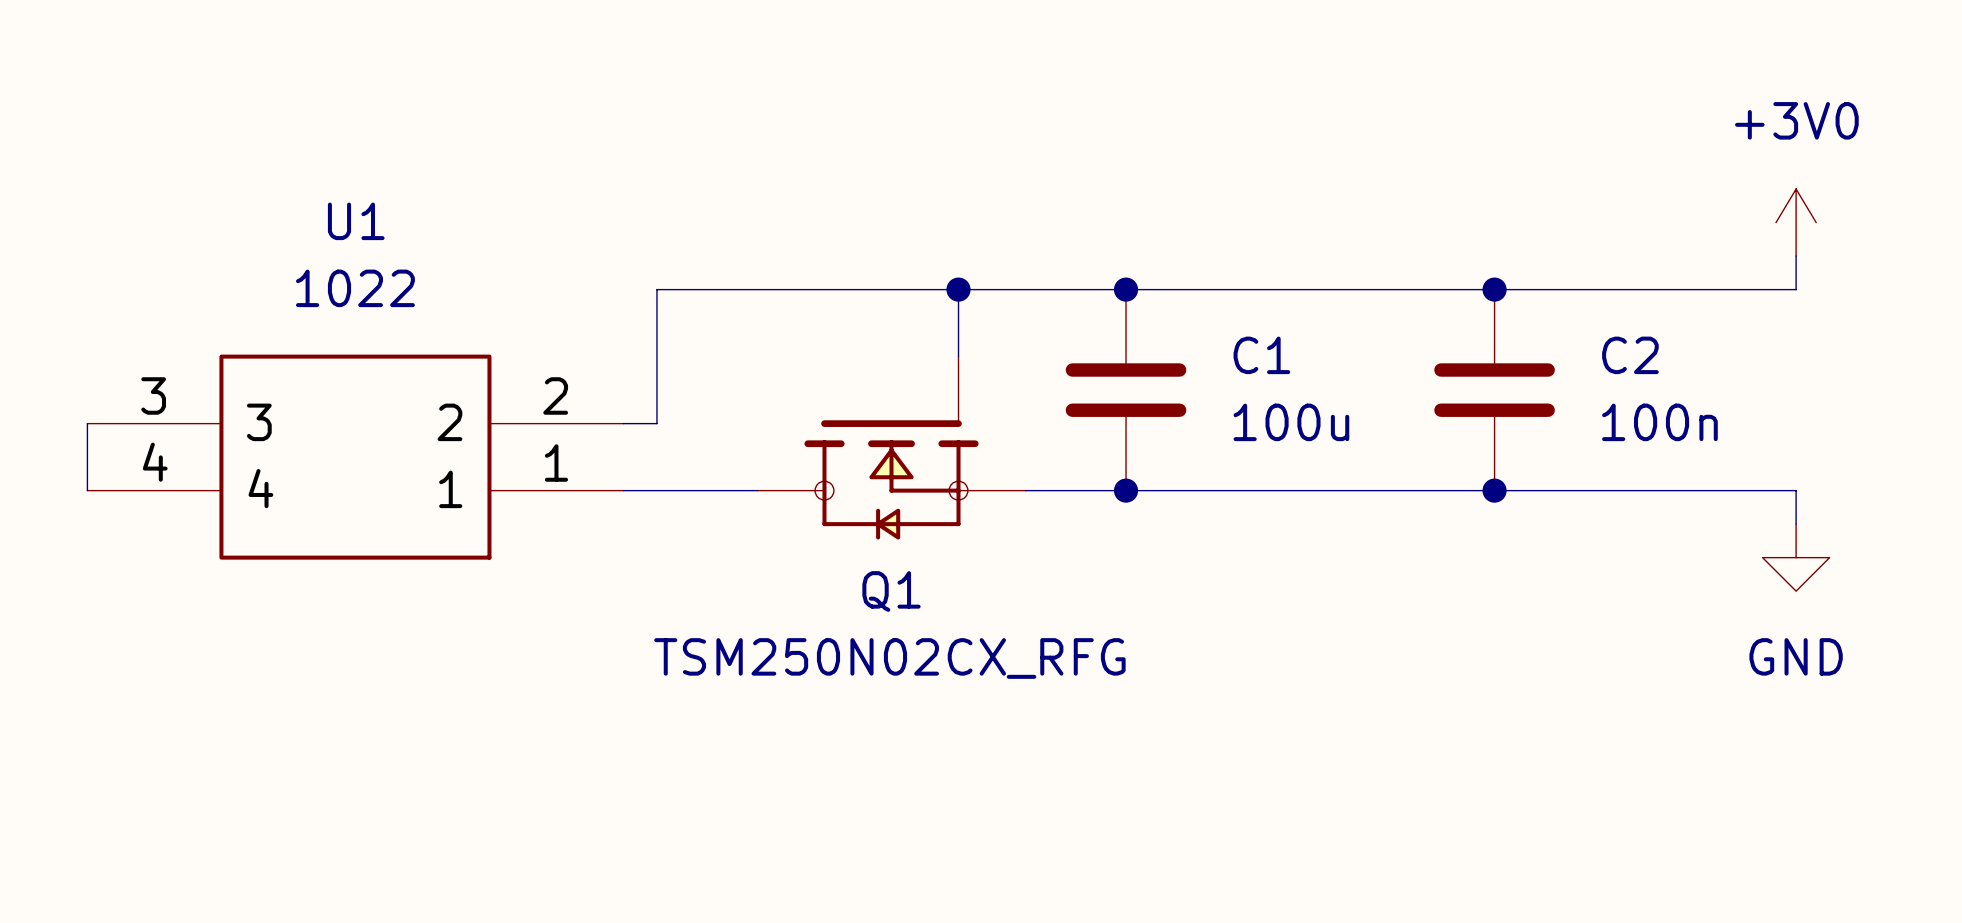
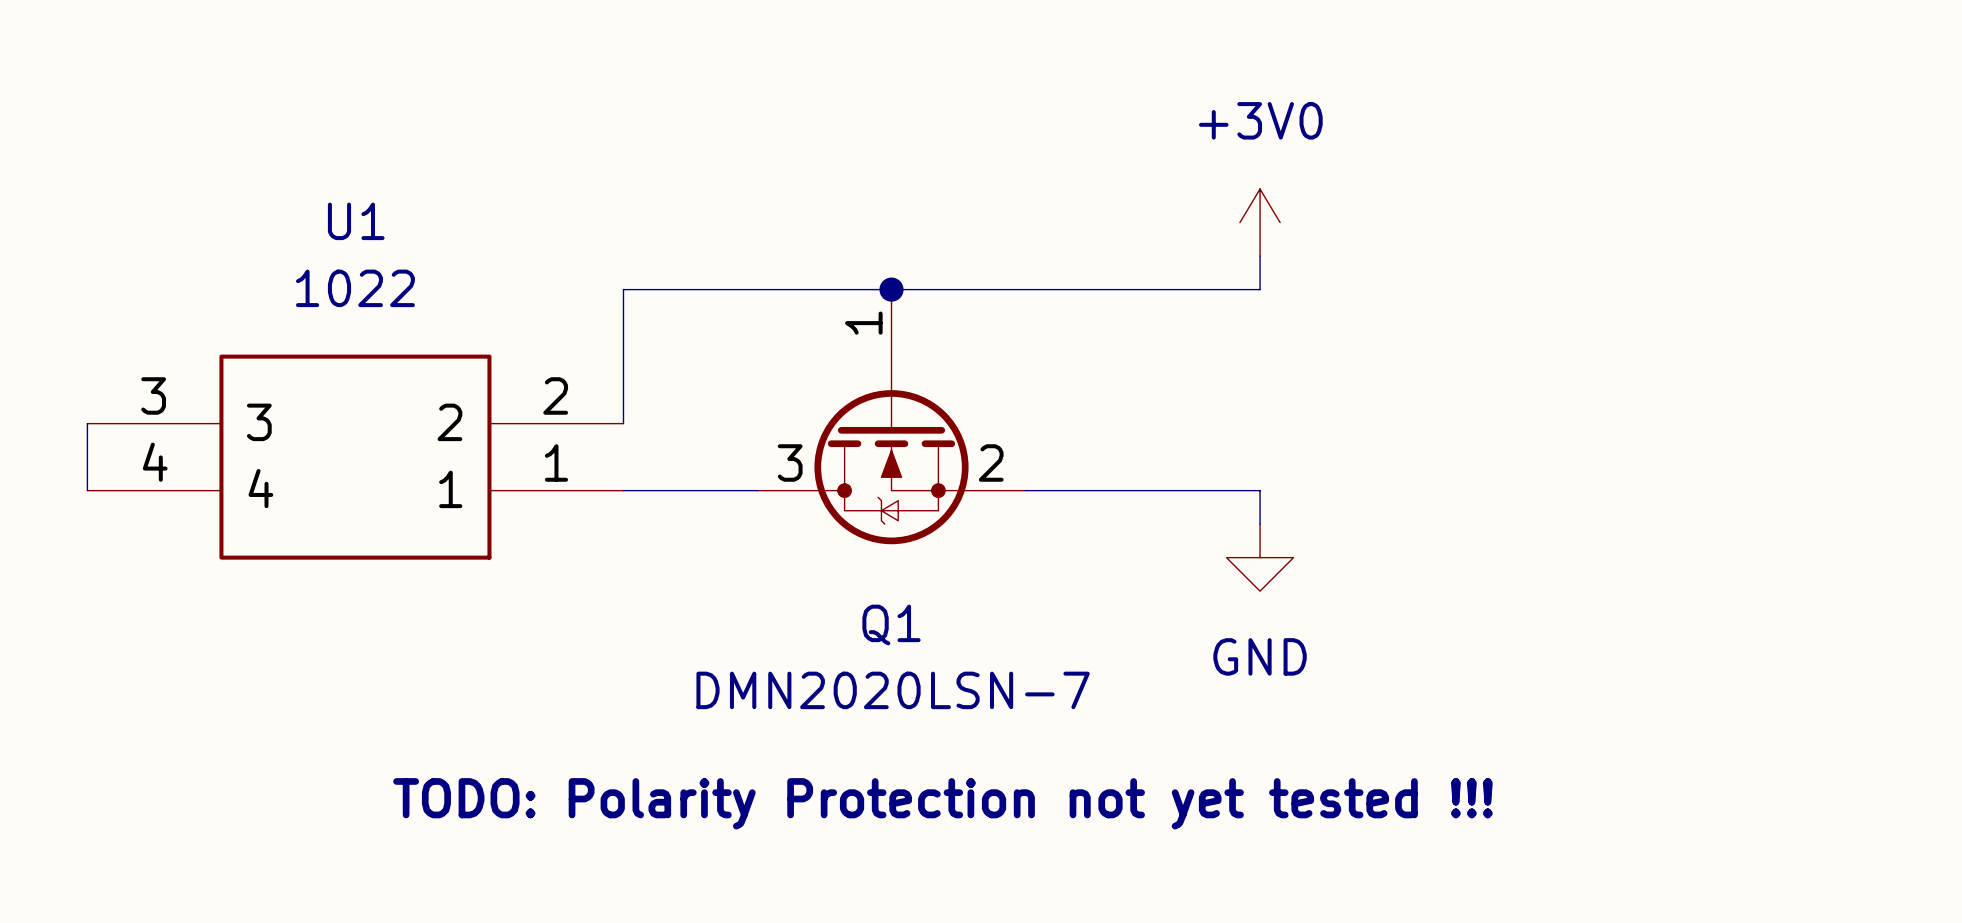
power symbol position: +3V0 (1796, 222) -> +3V0 (1260, 222)
wire: (1796, 256) (1796, 289) (1260, 289) -> (1260, 256) (1260, 289)
wire: (656, 289) (656, 423) (623, 423) -> (656, 289) (623, 289) (623, 423)
wire: (958, 289) (958, 356) -> none
junction position: (958, 289) -> (891, 289)
junction: (1126, 289) -> none
junction: (1494, 289) -> none
Q1 symbol: [757, 356, 1026, 540] -> [757, 289, 1026, 545]
C1: 100u (1126, 390) -> none
C2: 100n (1494, 390) -> none
junction: (1126, 490) -> none
wire: (1260, 490) (1796, 490) (1796, 524) -> (1260, 490) (1260, 524)
junction: (1494, 490) -> none
power symbol position: GND (1796, 557) -> GND (1260, 557)
Q1 name position: Q1 (891, 591) -> Q1 (891, 624)
Q1 value: TSM250N02CX_RFG (889, 658) -> DMN2020LSN-7 (893, 690)
text: none -> TODO: Polarity Protection not yet tested !!! (942, 803)

